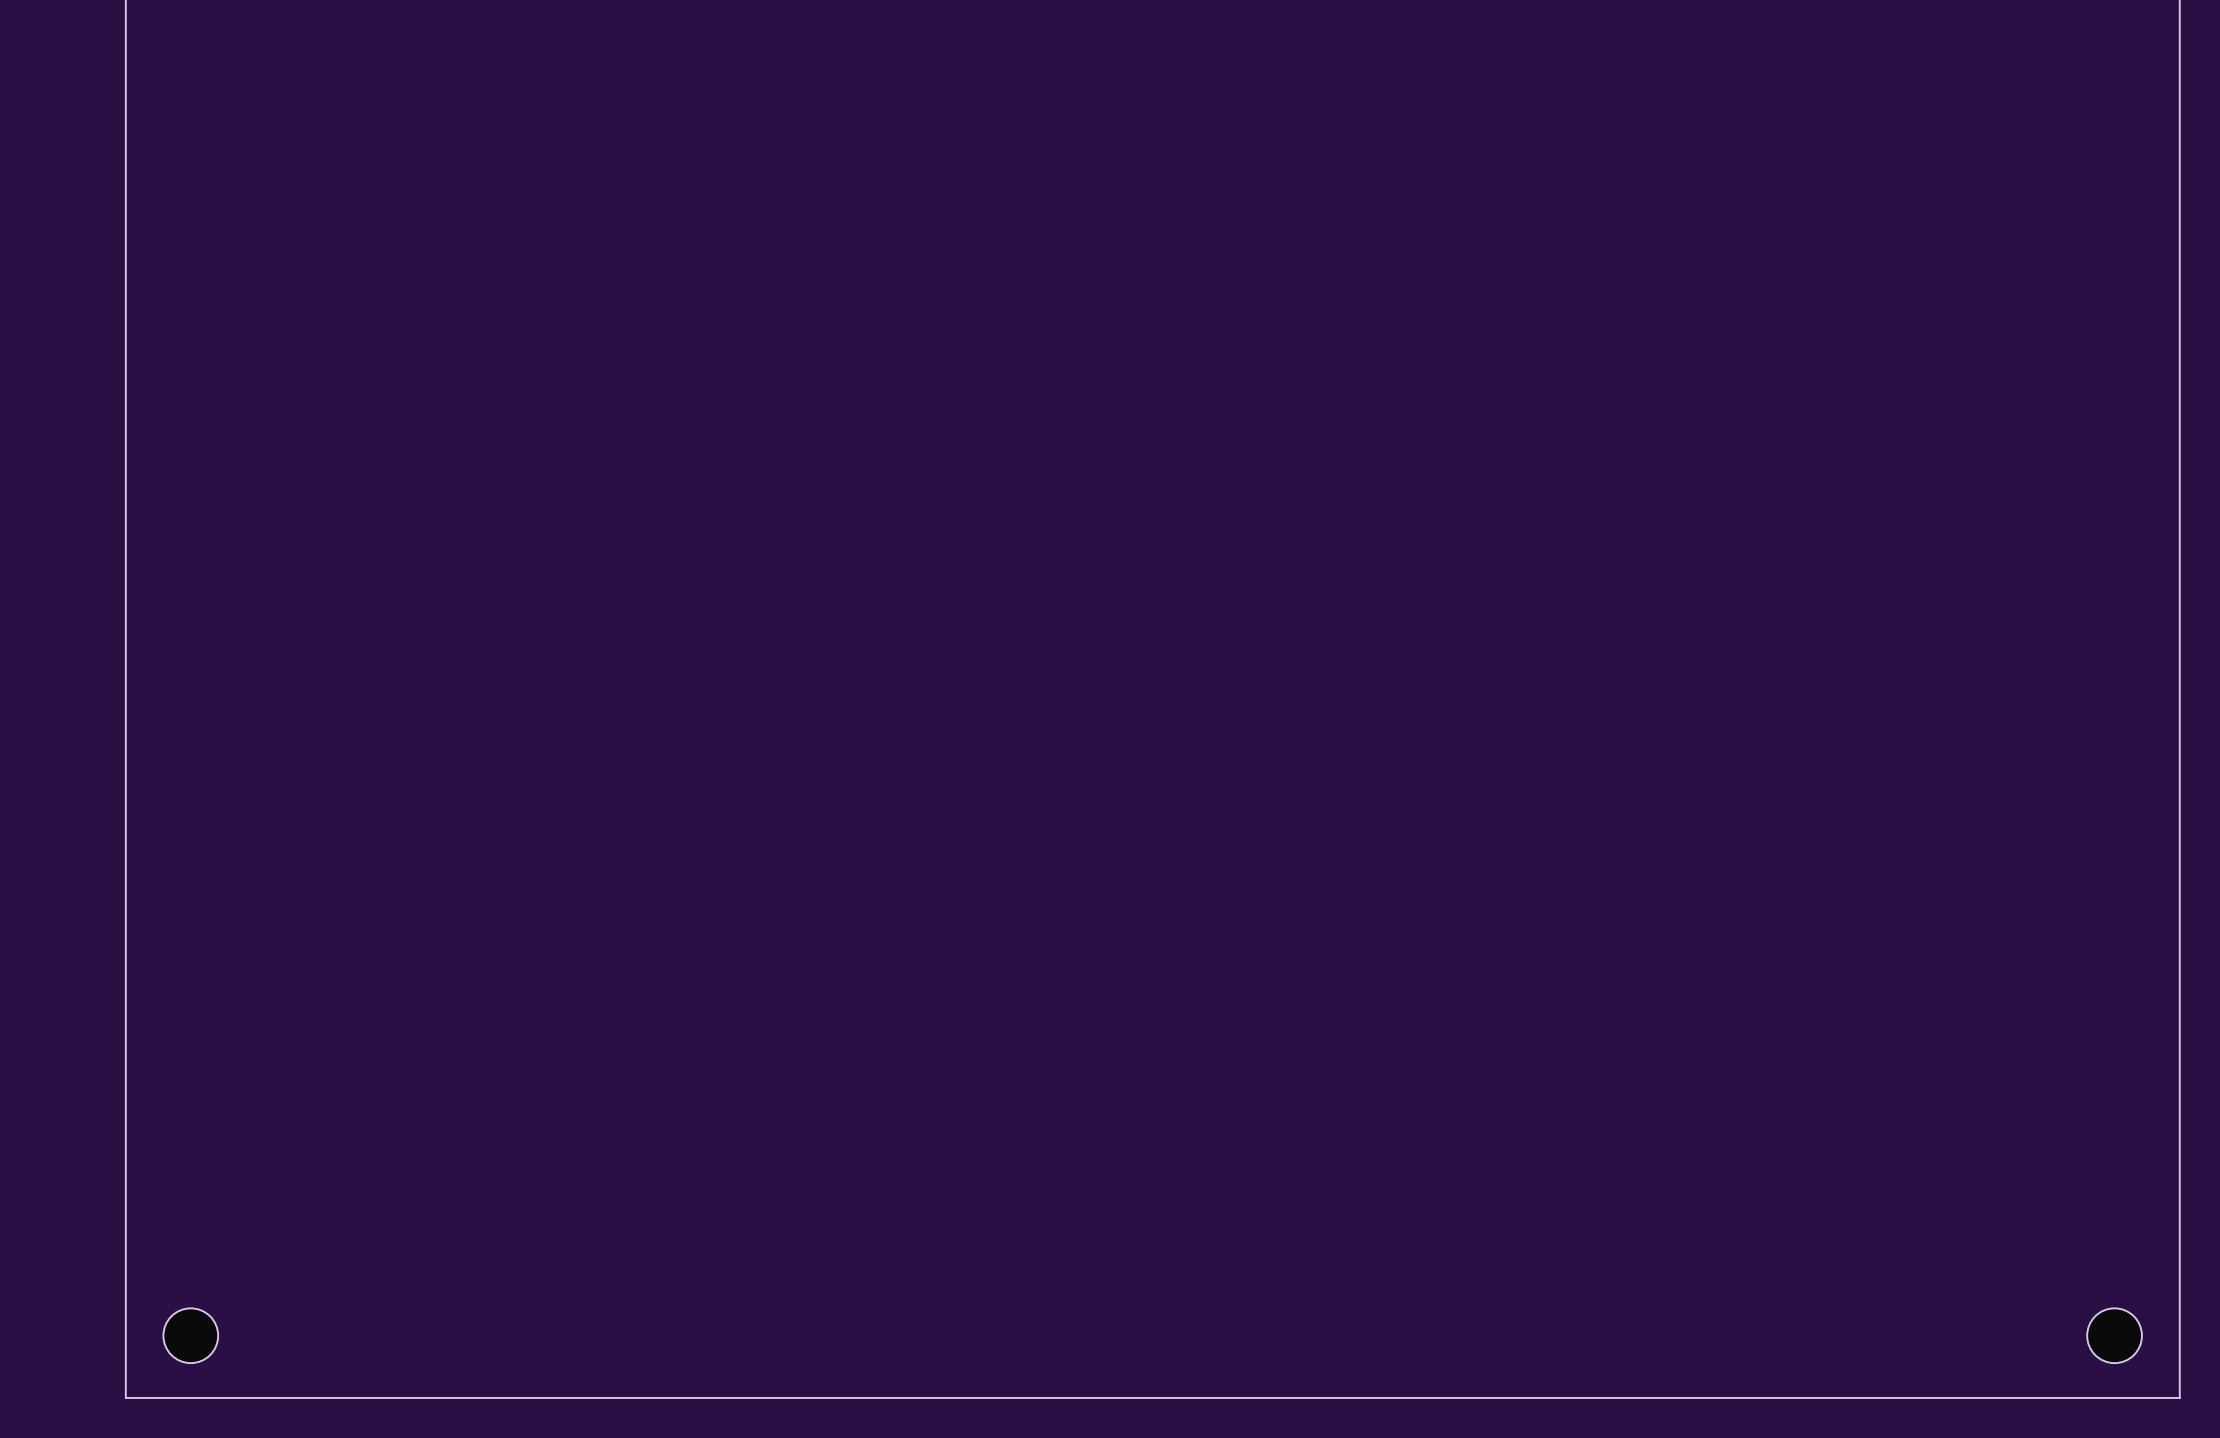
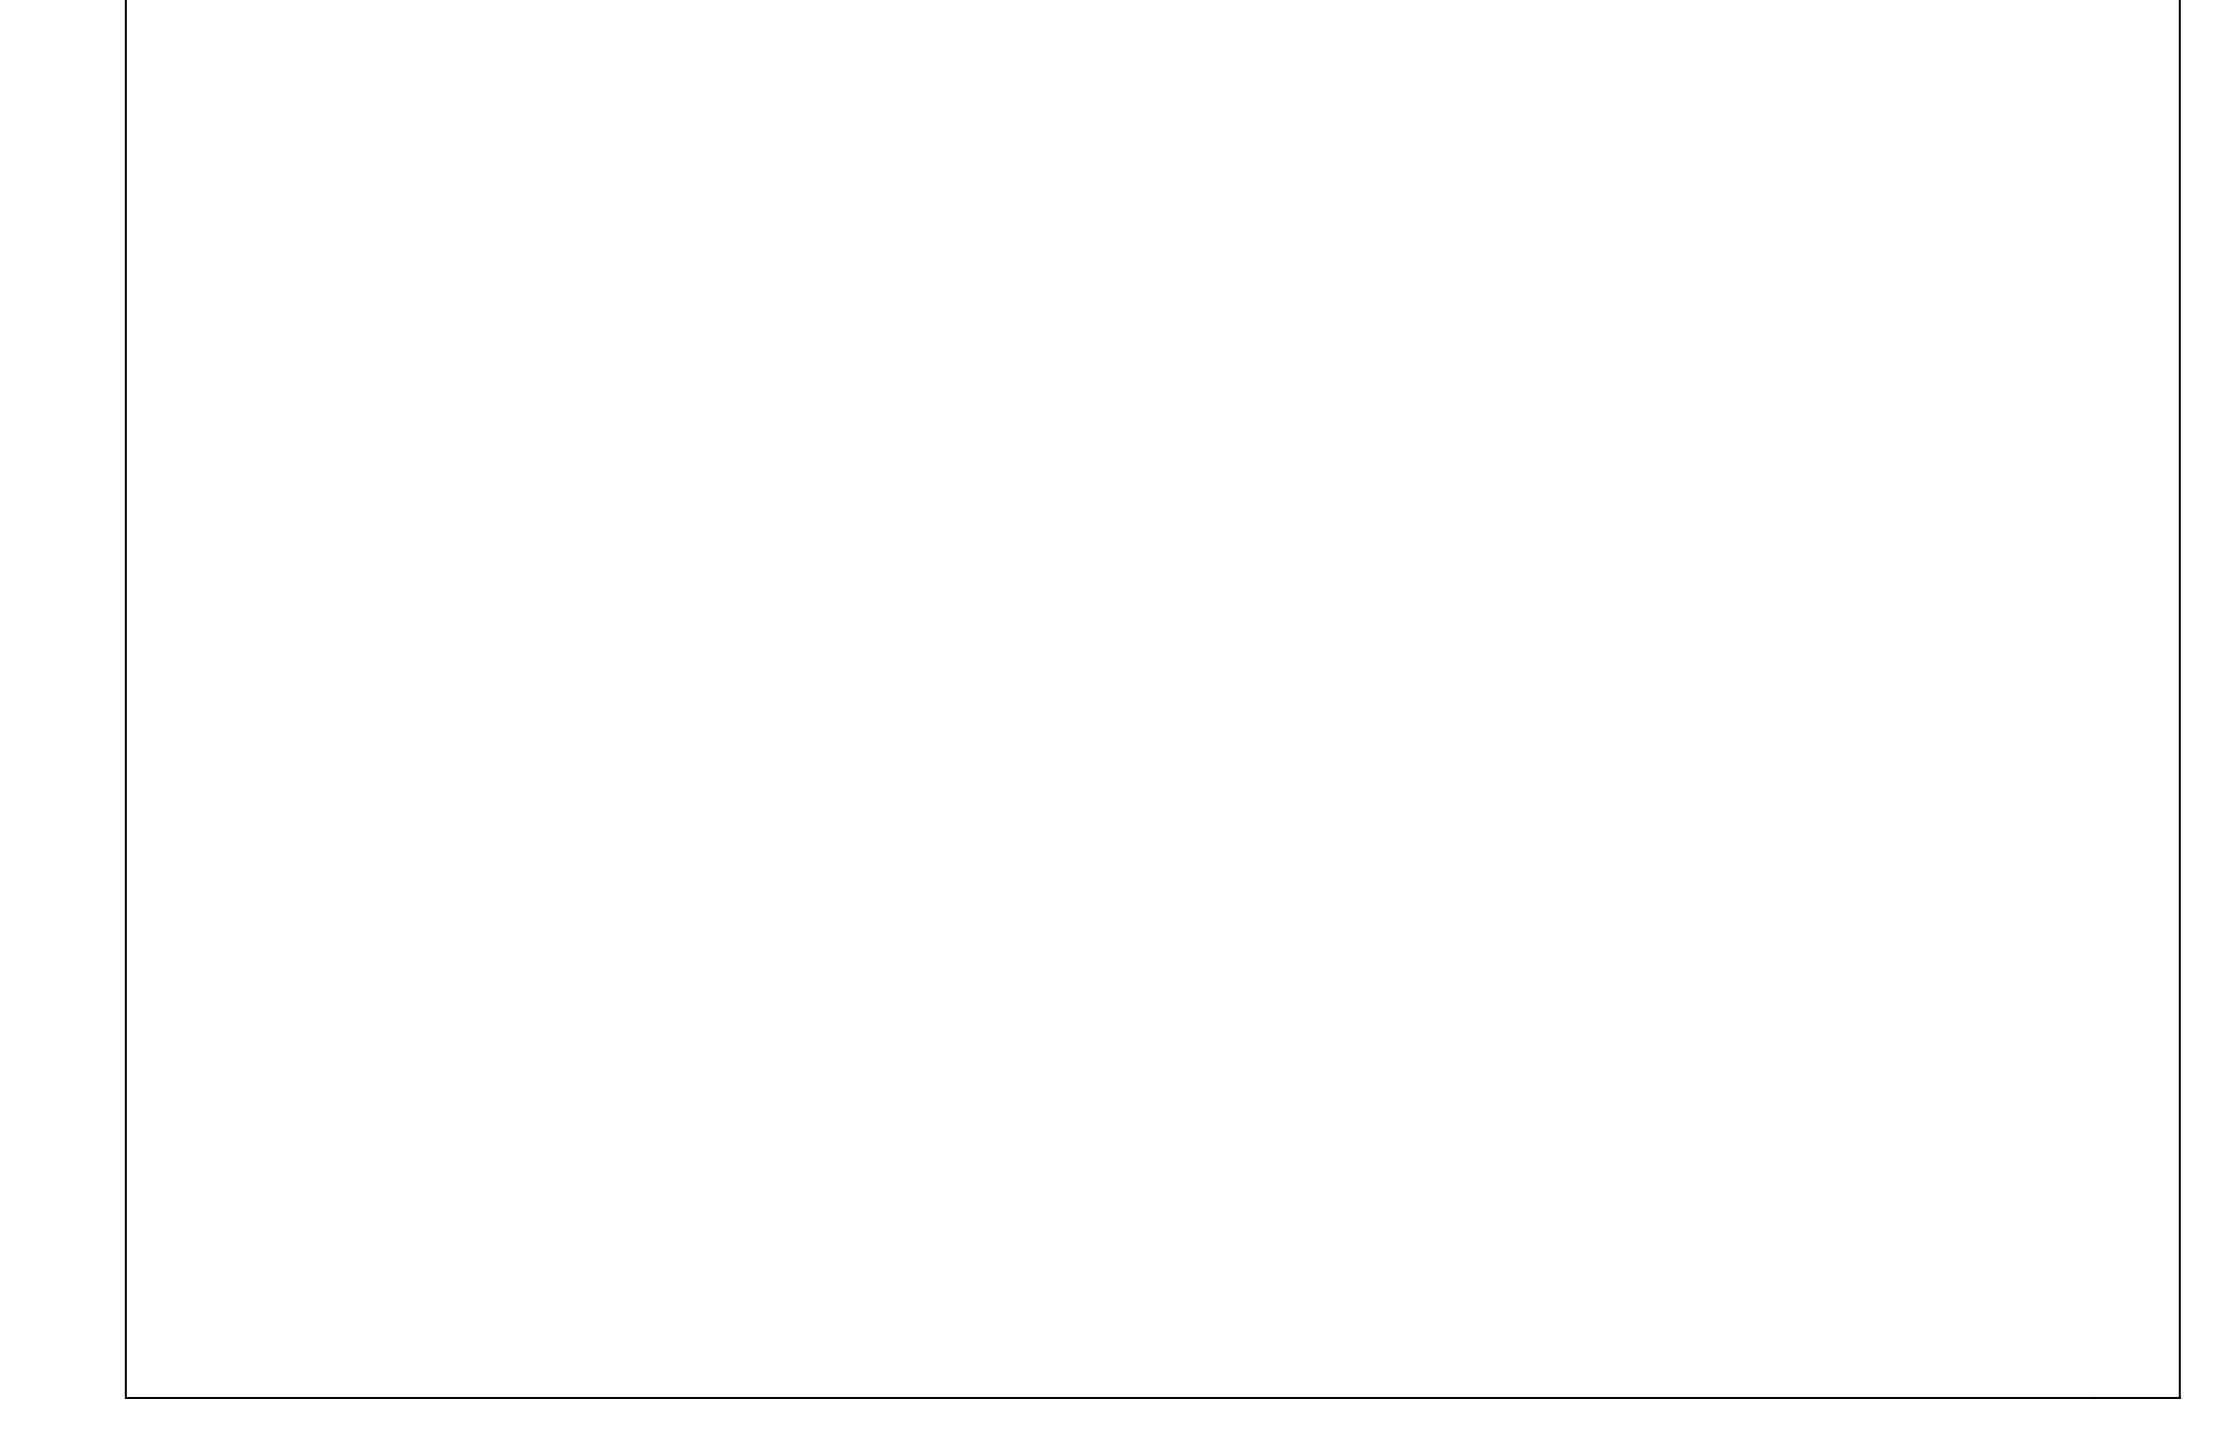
part: (190, 1335) -> none
part: (2114, 1335) -> none

